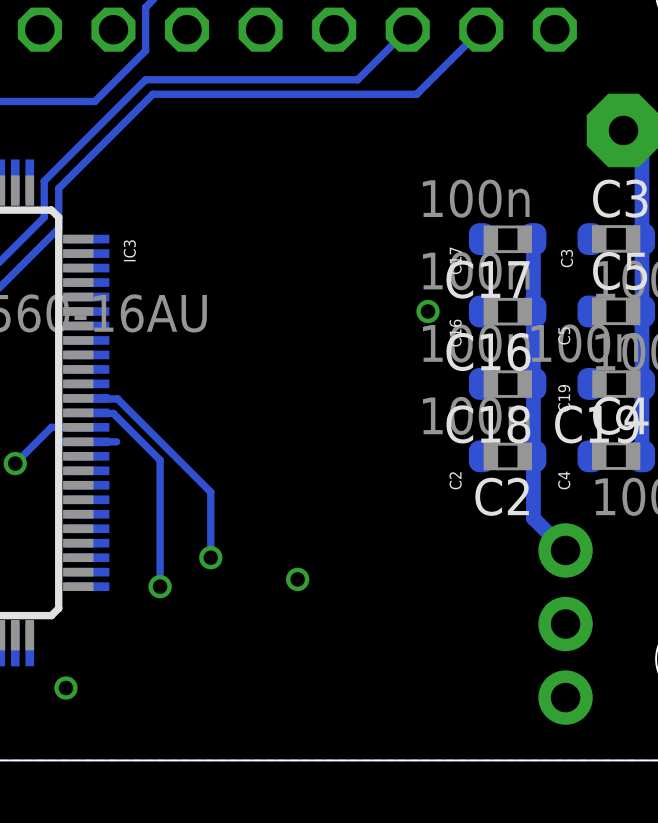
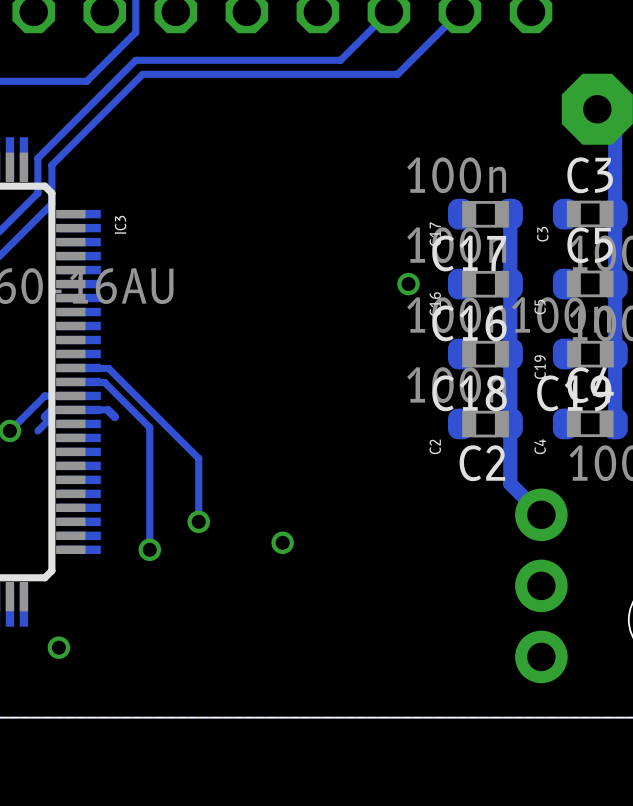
track: none -> (107, 409) (114, 416)
track: none -> (44, 416) (51, 409) (49, 419) (37, 430)

